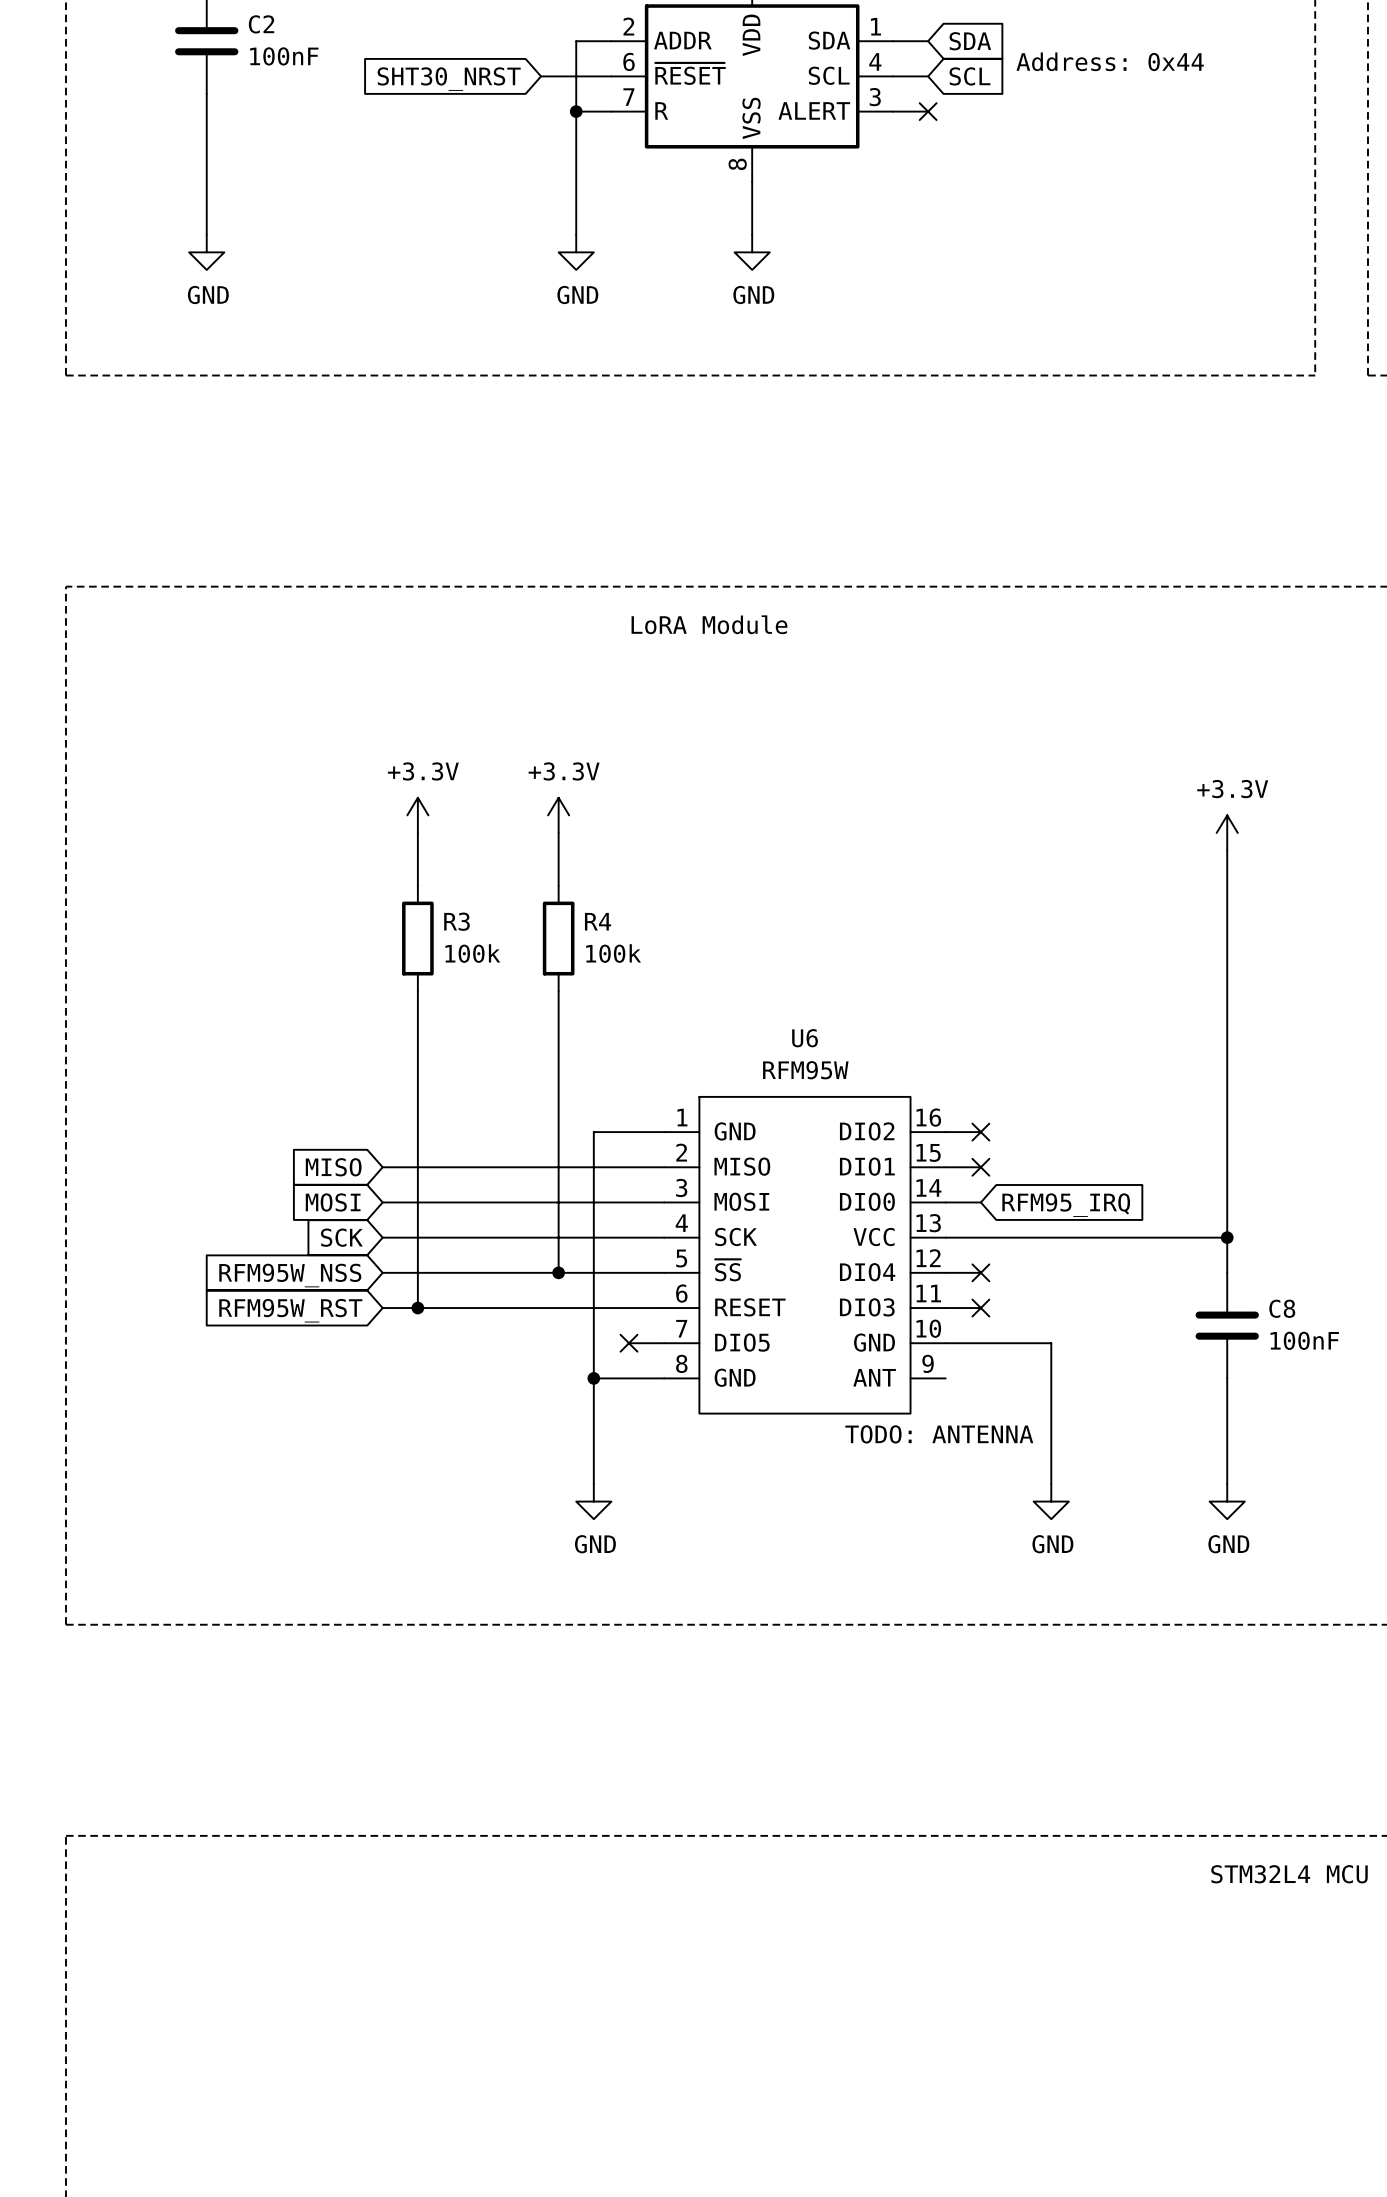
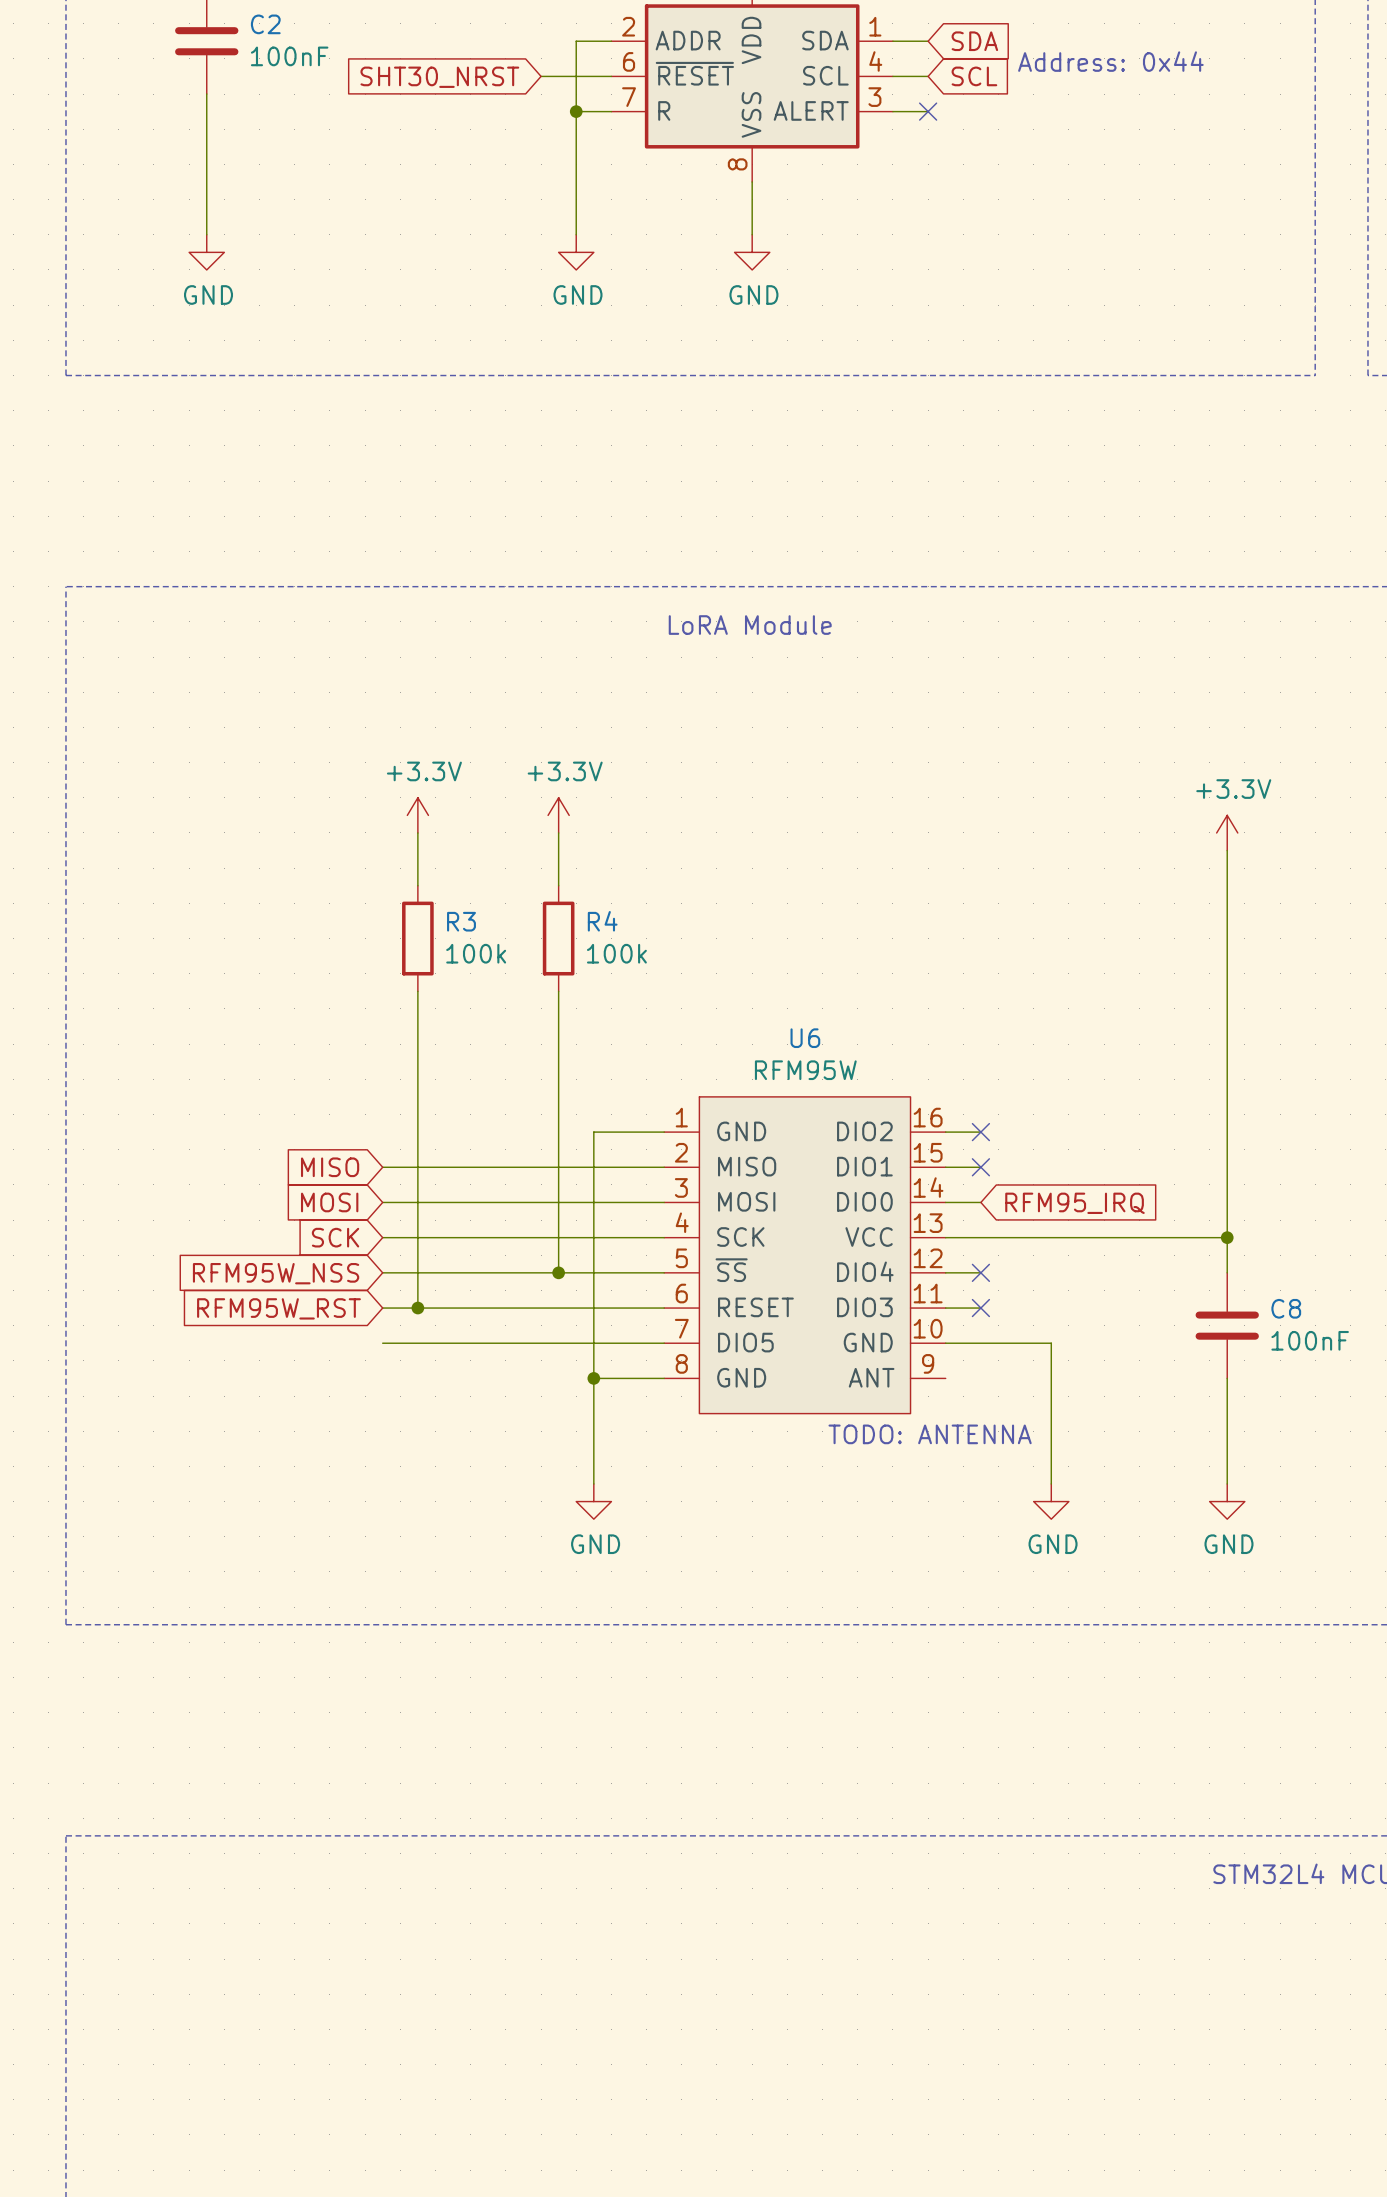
text position: LoRA Module (709, 624) -> LoRA Module (750, 625)
wire: none -> (382, 1343) (629, 1343)
no-connect mark: (629, 1343) -> none

